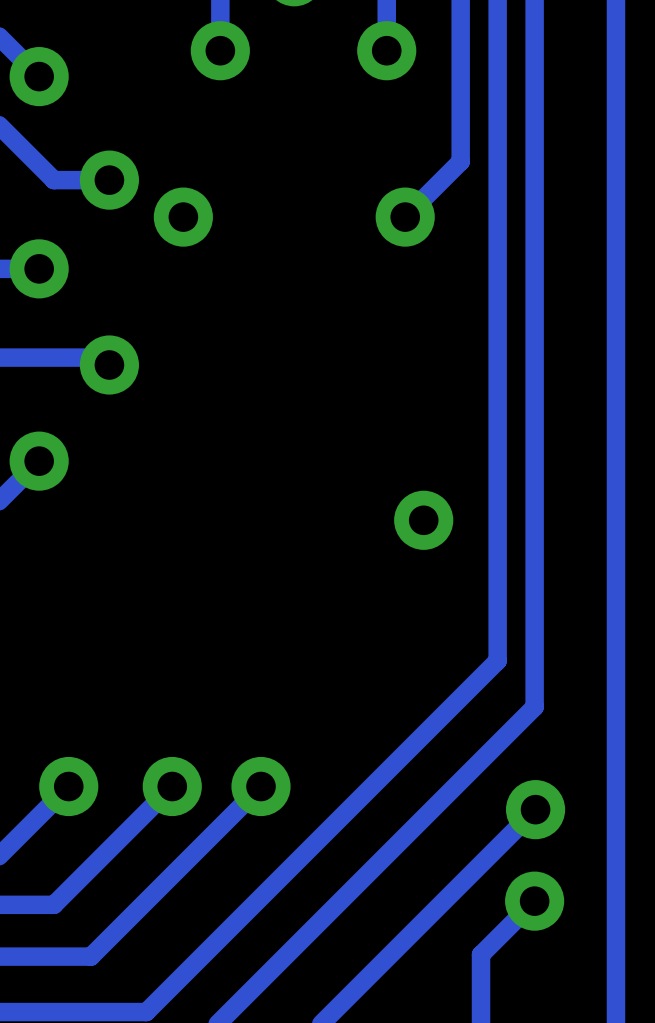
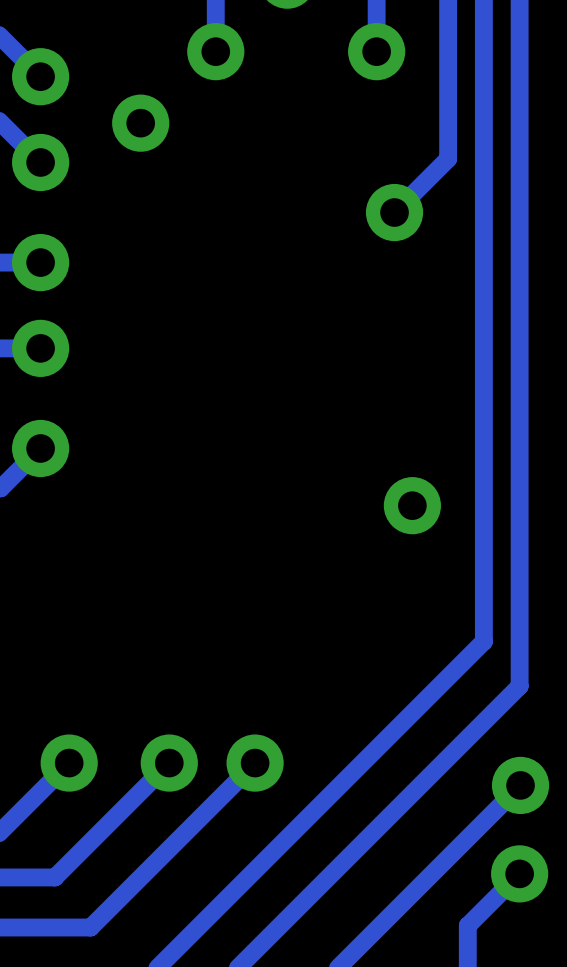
track: (39, 165) (53, 180) (109, 180) -> none
via: none -> (40, 162)
via position: (109, 180) -> (140, 123)
via: (183, 217) -> none
track: (39, 357) (102, 357) (109, 365) -> none
via position: (109, 365) -> (40, 348)

